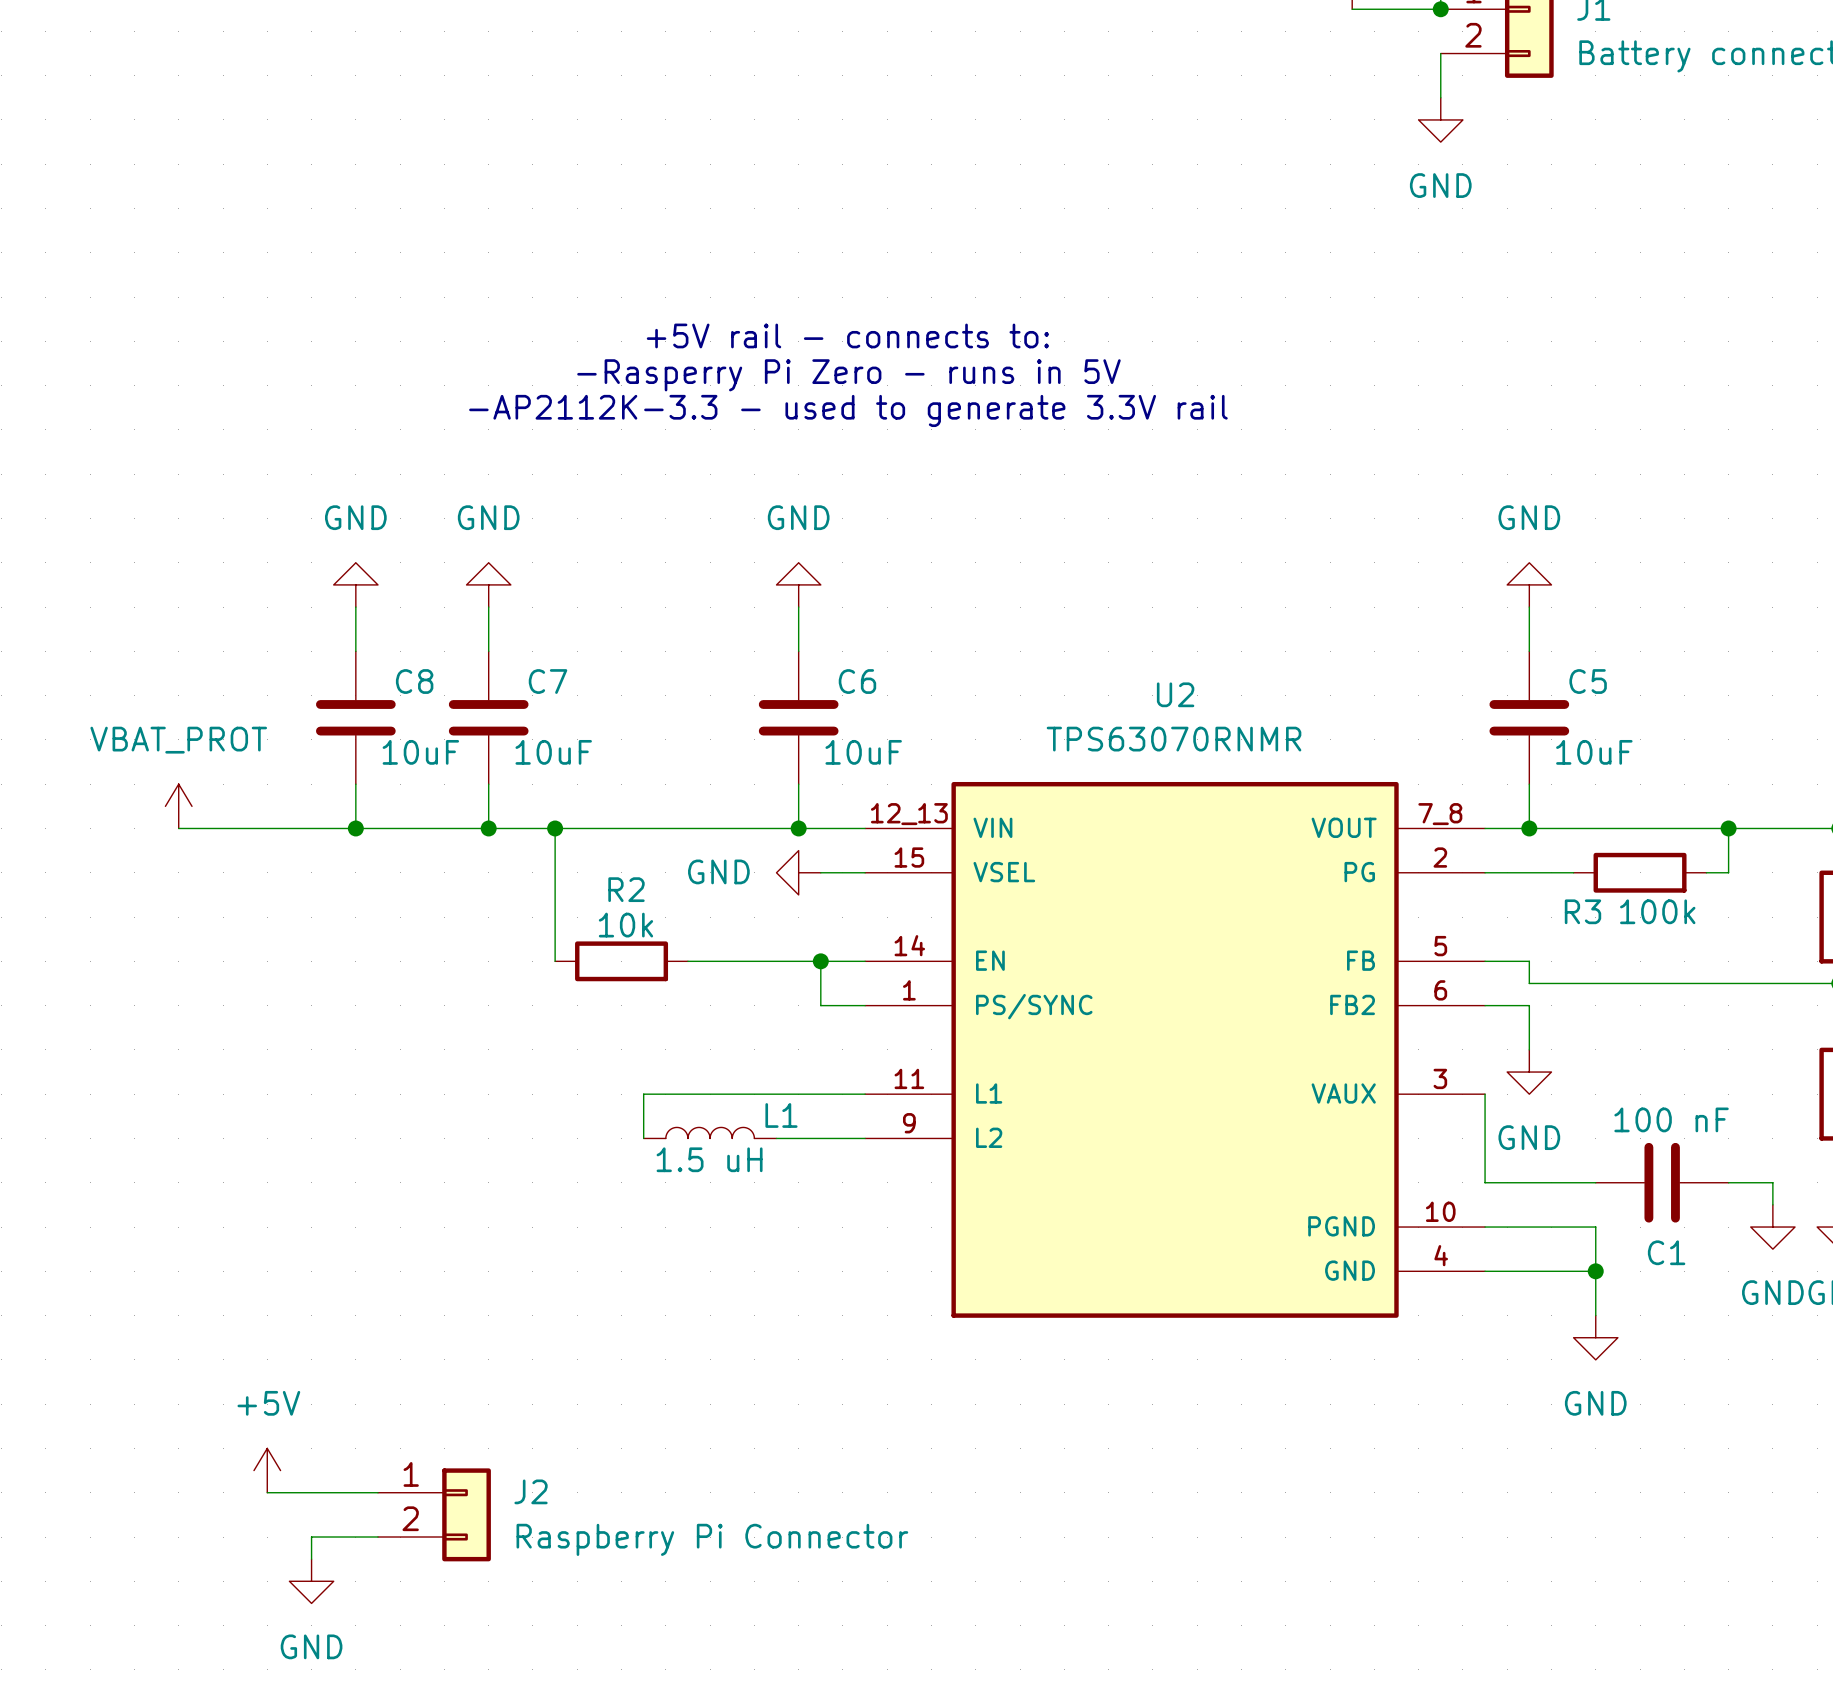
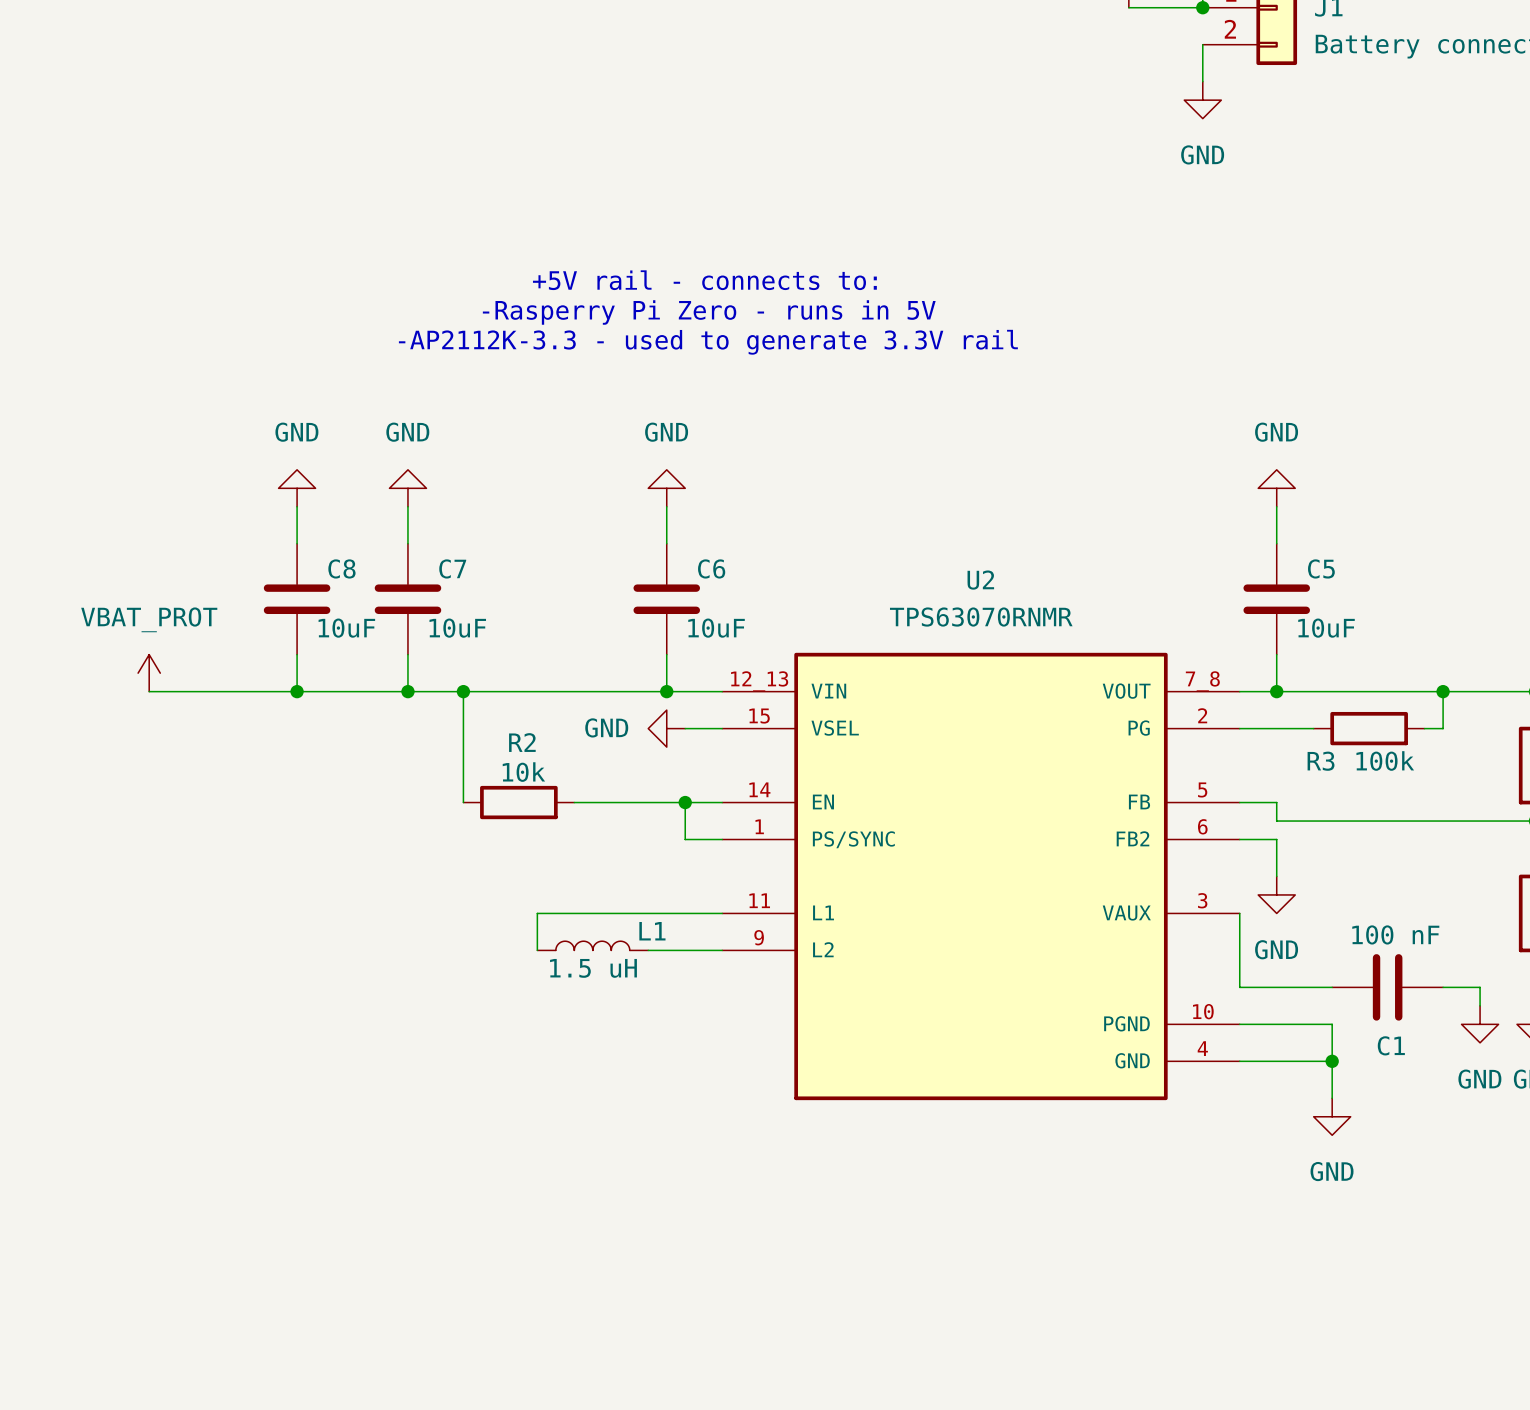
power symbol: +5V (267, 1470) -> none
wire: (267, 1492) (377, 1492) -> none
J2: Raspberry Pi Connector (434, 1514) -> none
wire: (377, 1537) (311, 1537) (311, 1559) -> none
power symbol: GND (311, 1581) -> none

